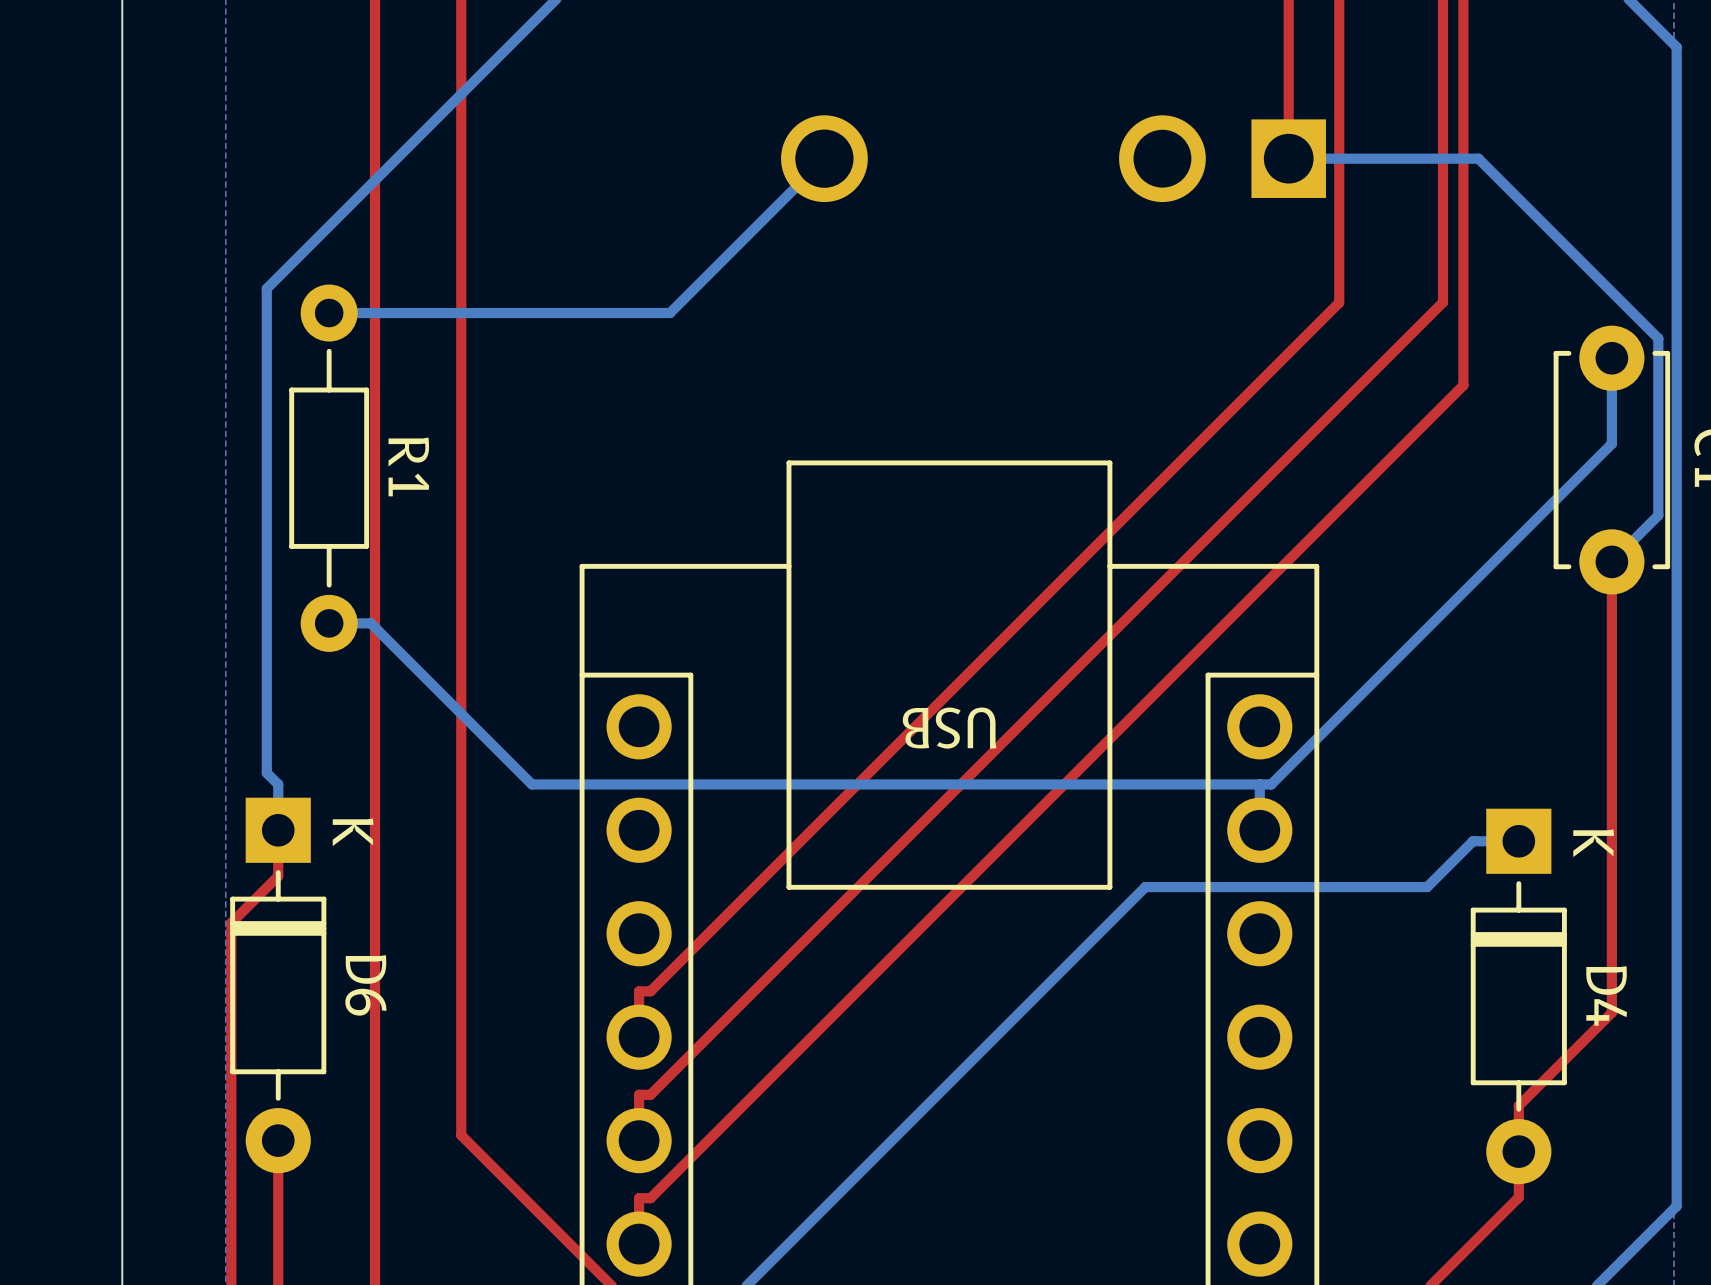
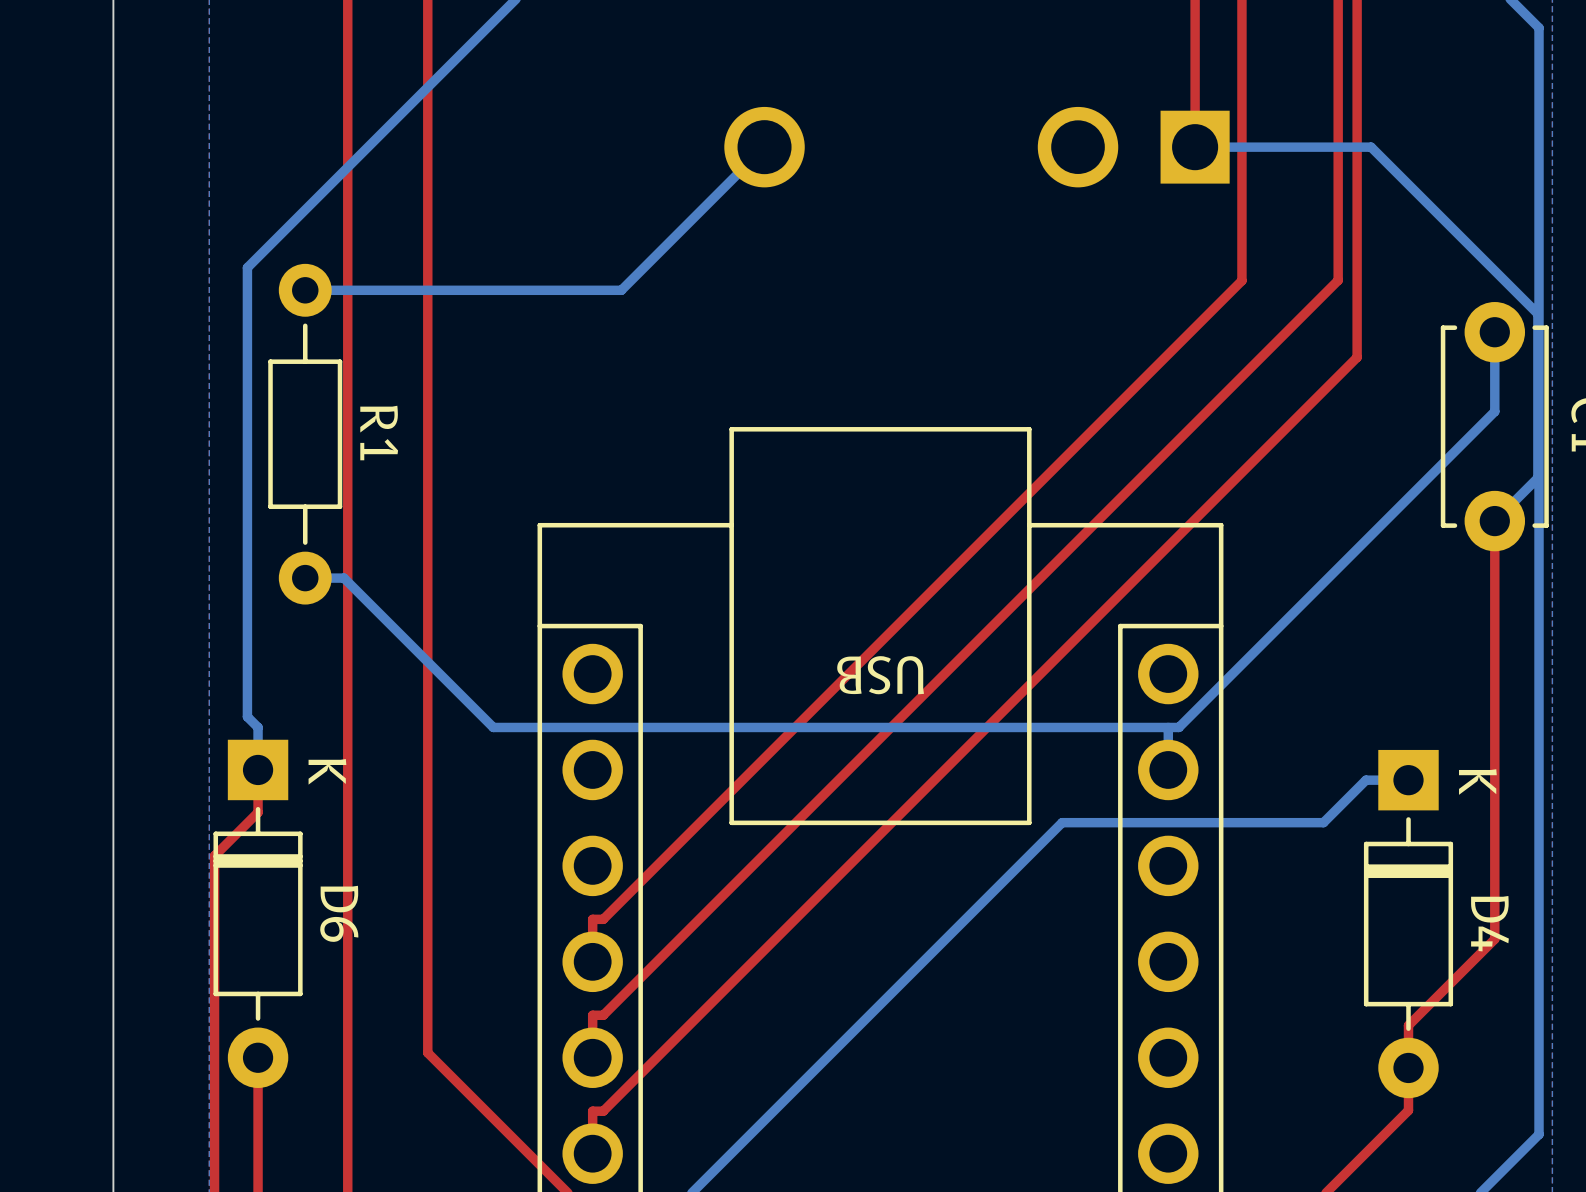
bottom track: (1659, 30) (1676, 47) (1676, 1206) (1659, 1223) -> (1539, 27) (1539, 1134)

